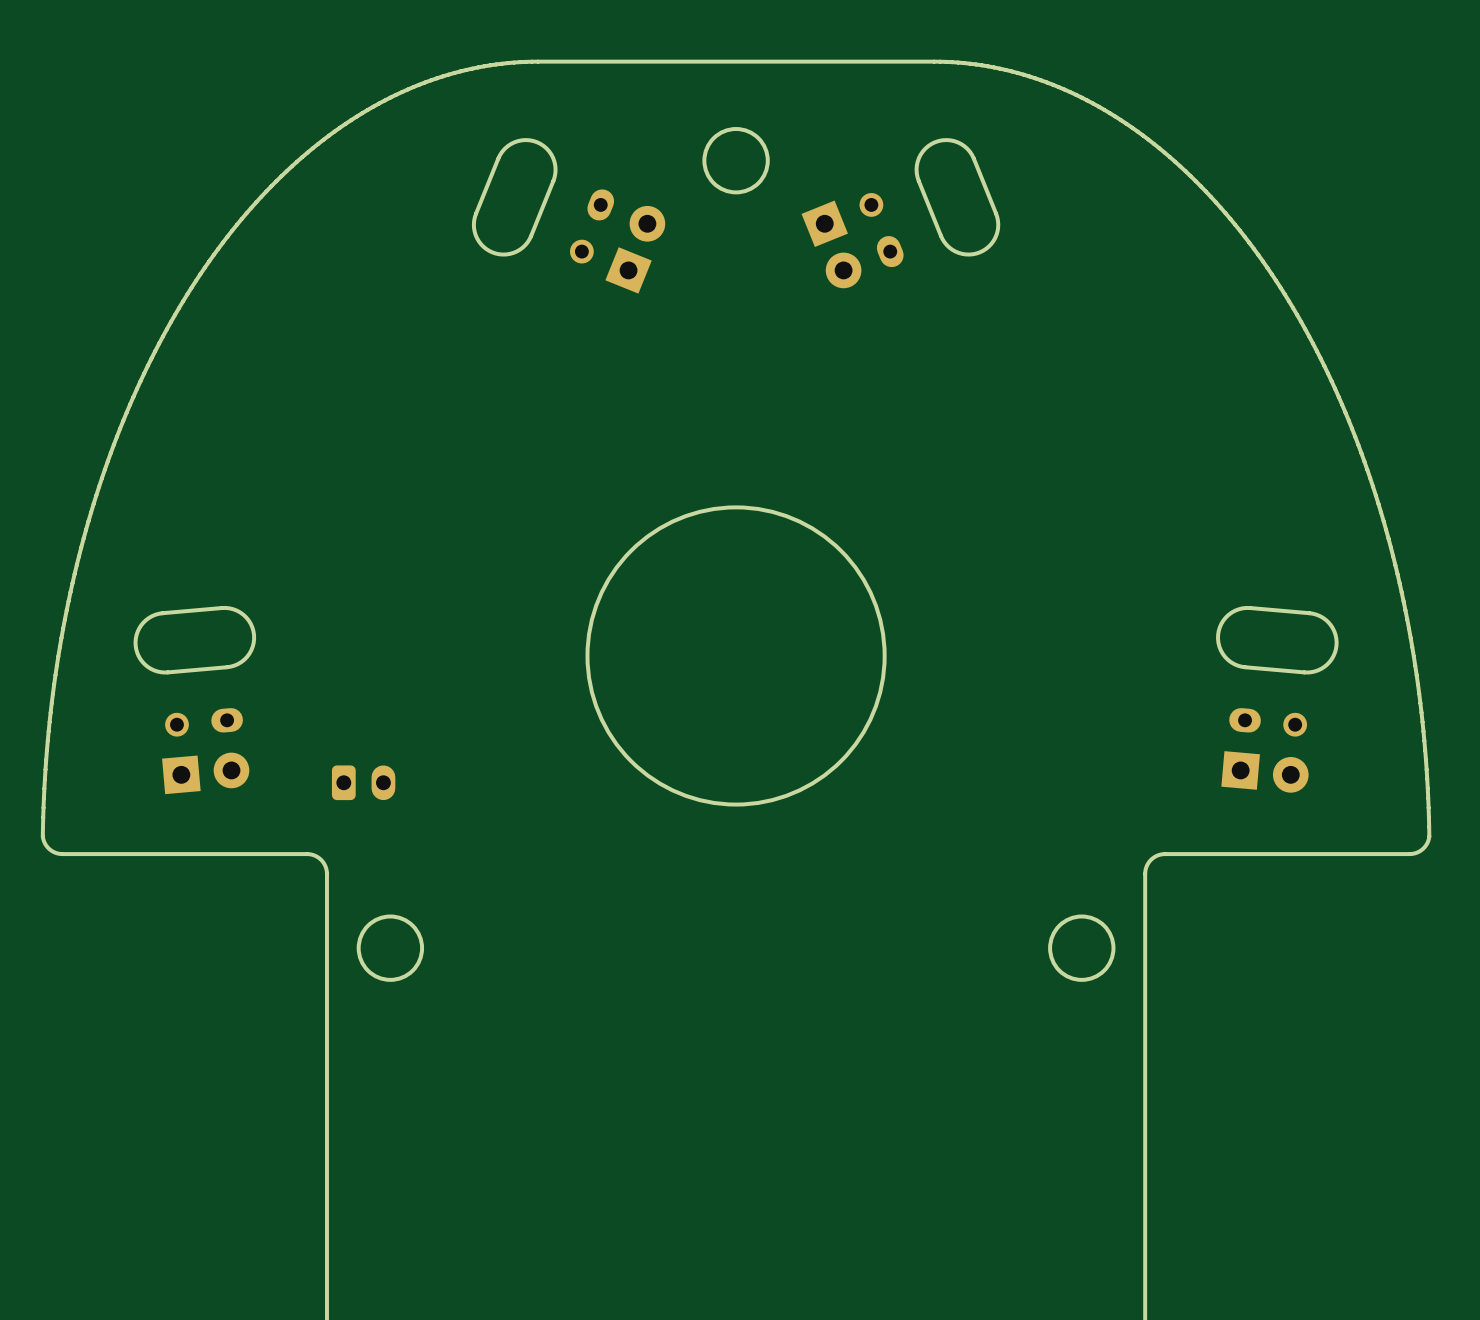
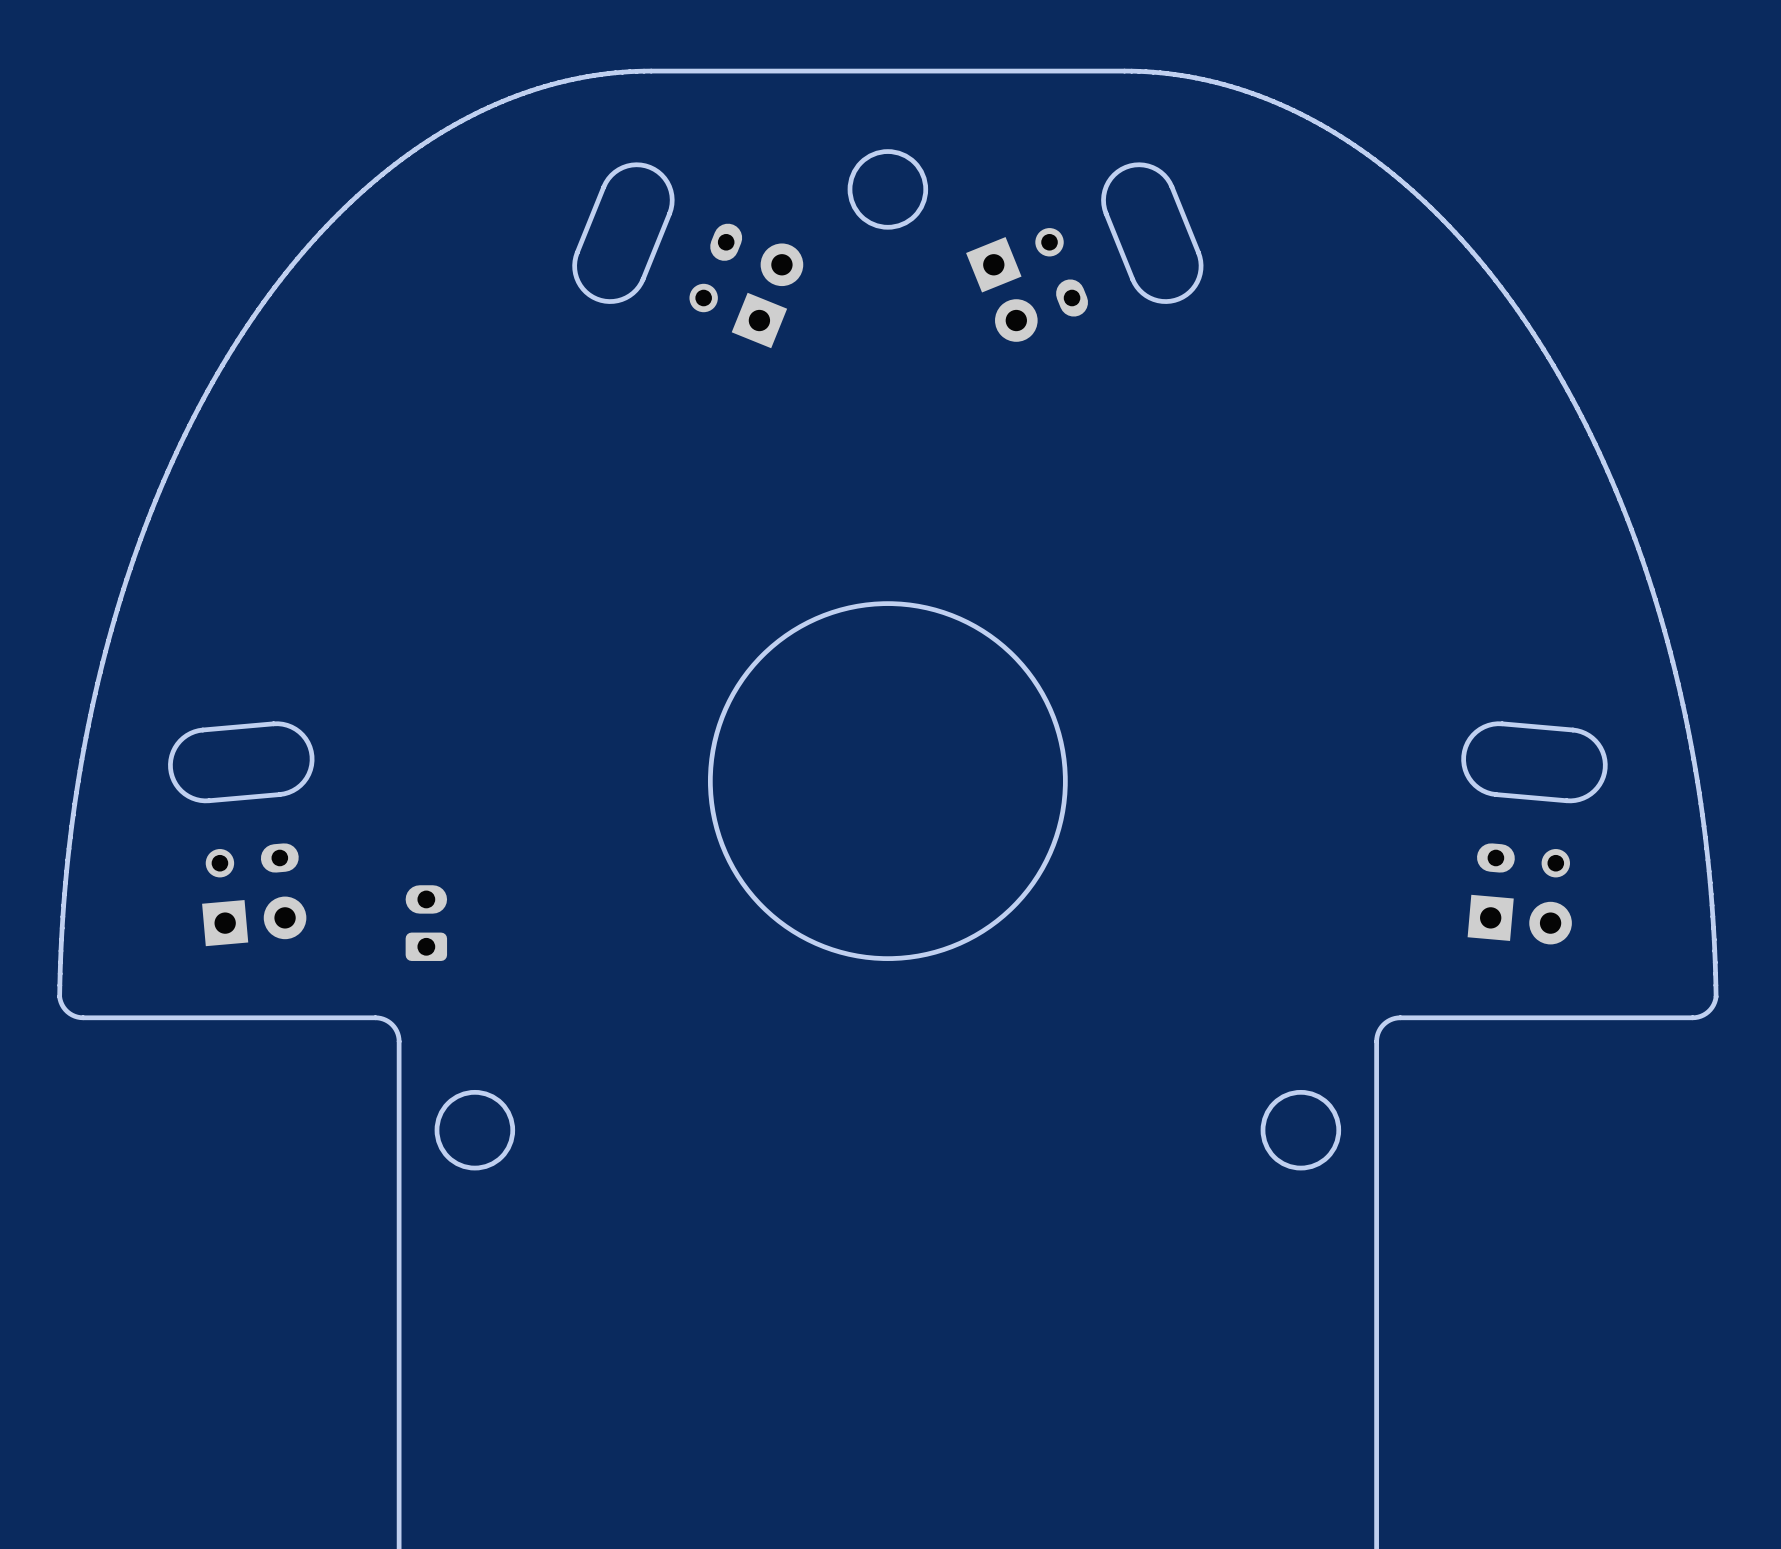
part rotation: 0° (363, 782) -> 90° counterclockwise (426, 923)

